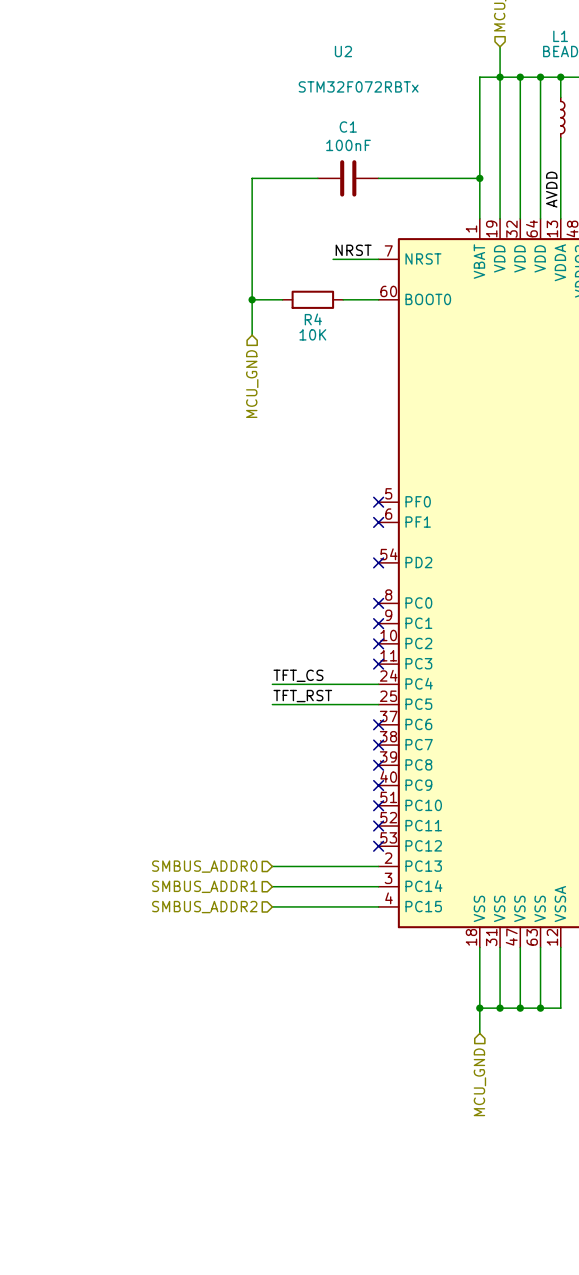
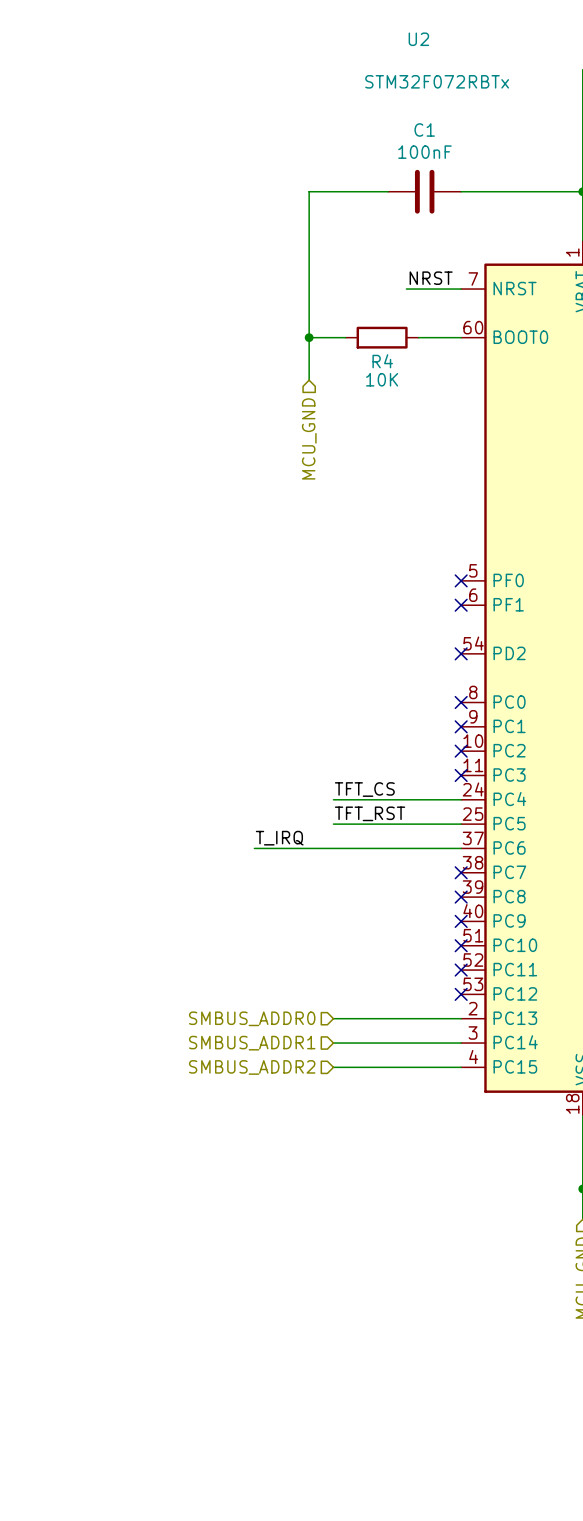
label: none -> T_IRQ (279, 838)
wire: none -> (254, 848) (461, 848)
no-connect mark: (378, 724) -> none

